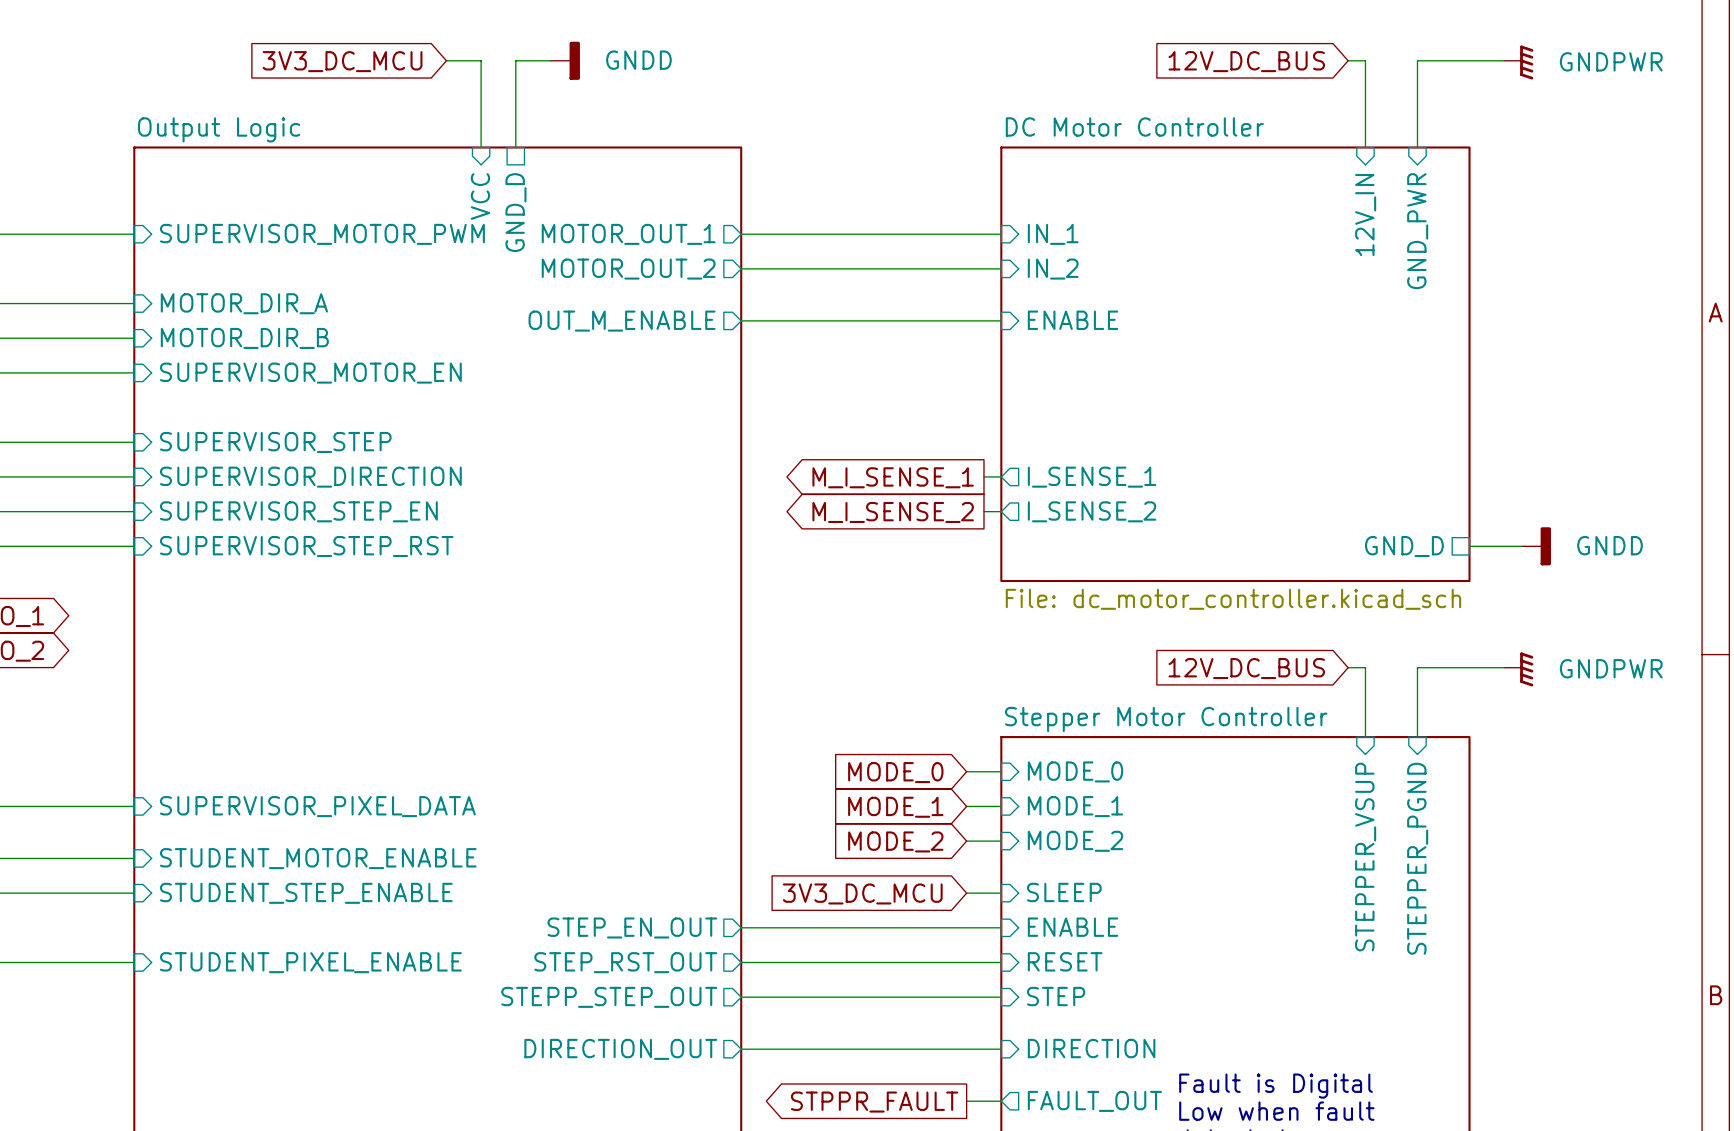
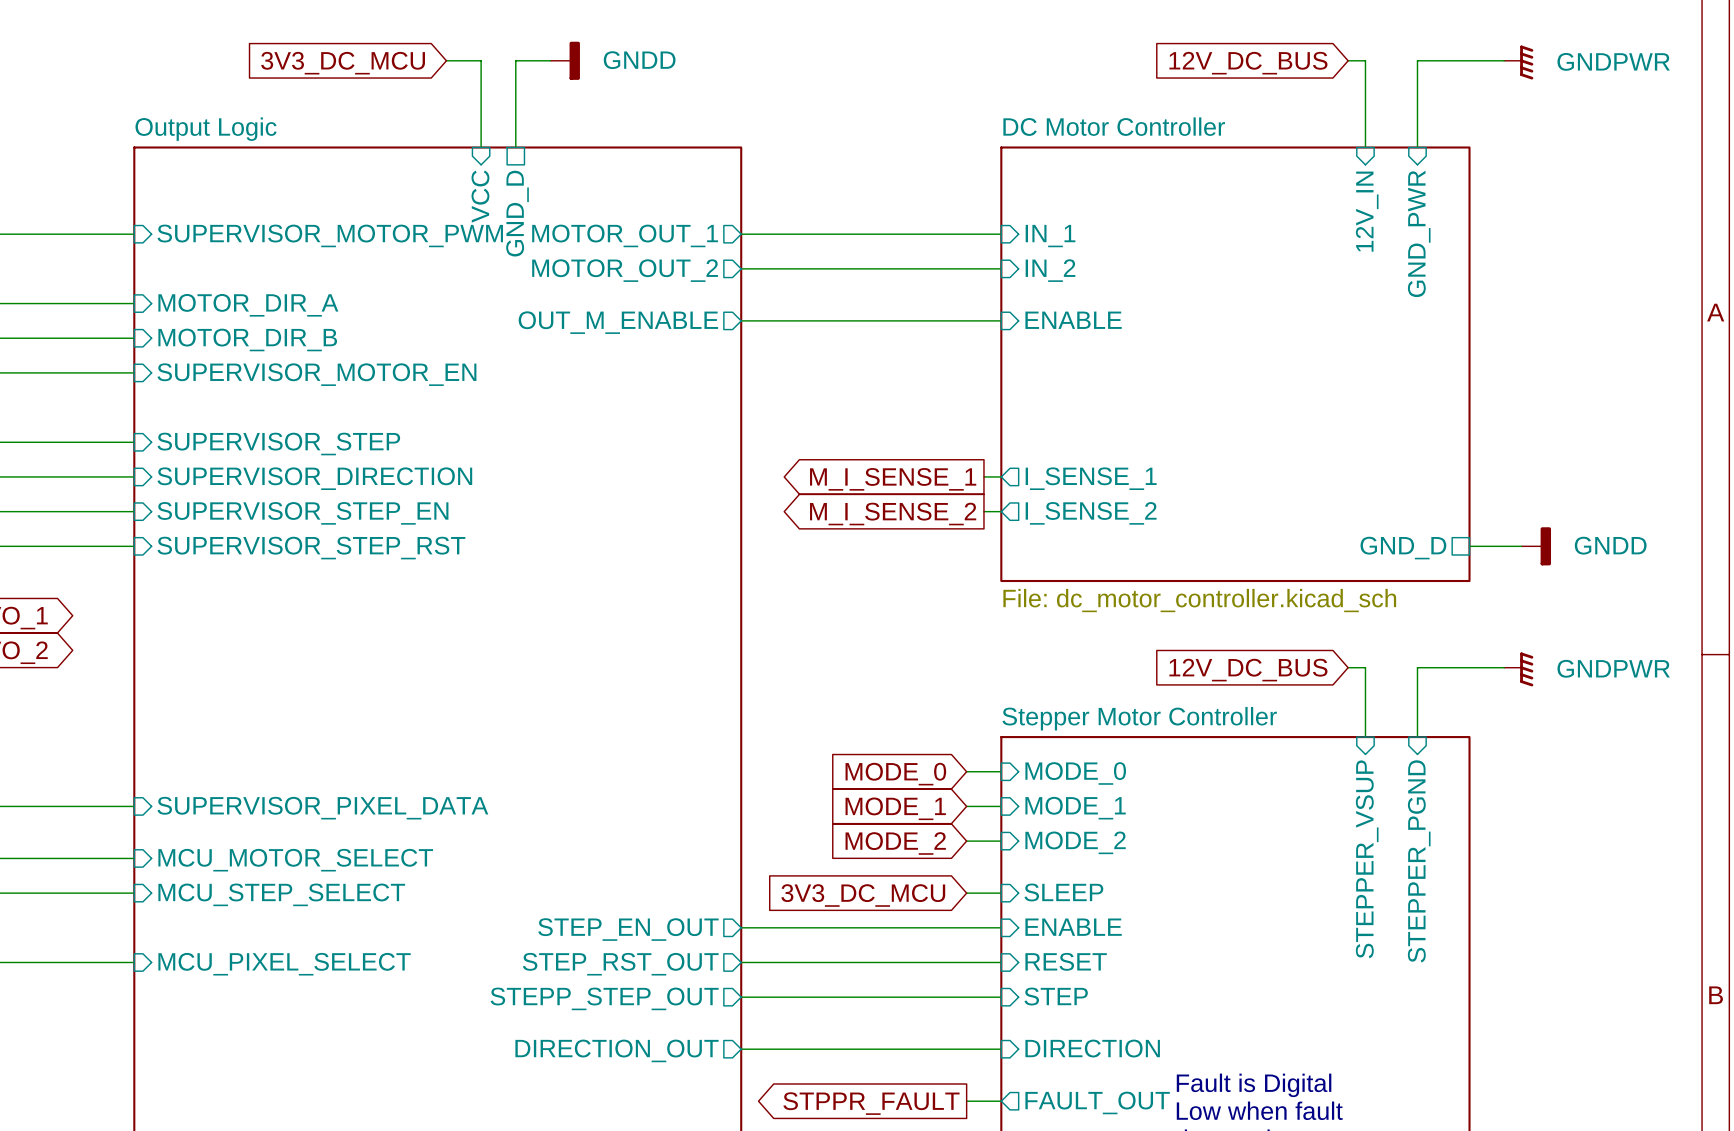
sheet pin: STUDENT_MOTOR_ENABLE (318, 858) -> MCU_MOTOR_SELECT (295, 860)
sheet pin: STUDENT_STEP_ENABLE (306, 893) -> MCU_STEP_SELECT (281, 894)
sheet pin: STUDENT_PIXEL_ENABLE (310, 962) -> MCU_PIXEL_SELECT (284, 964)

